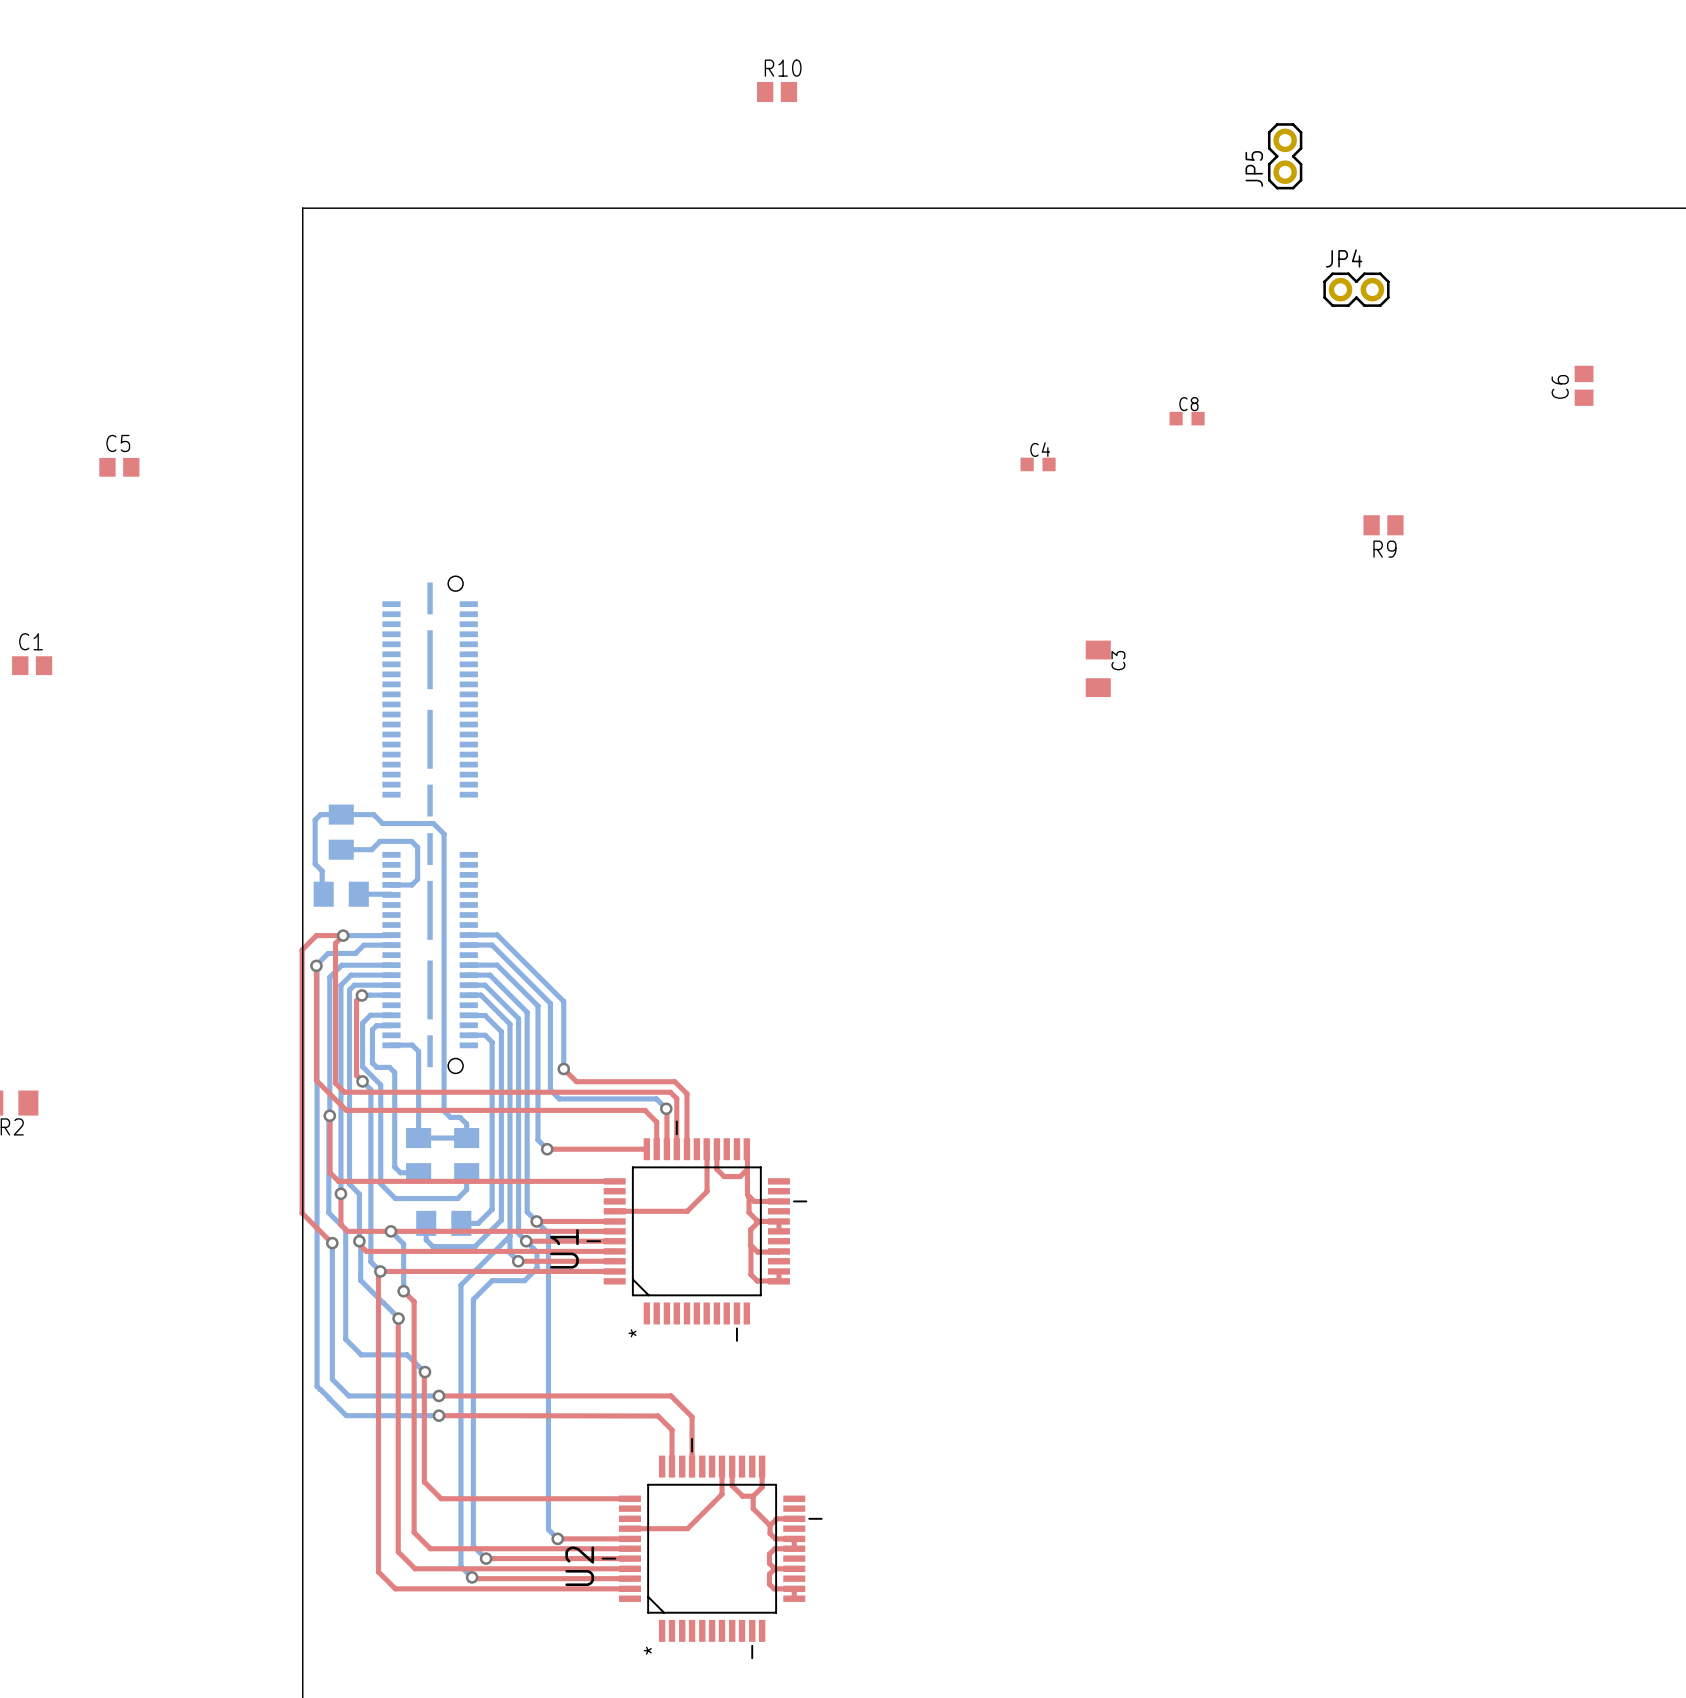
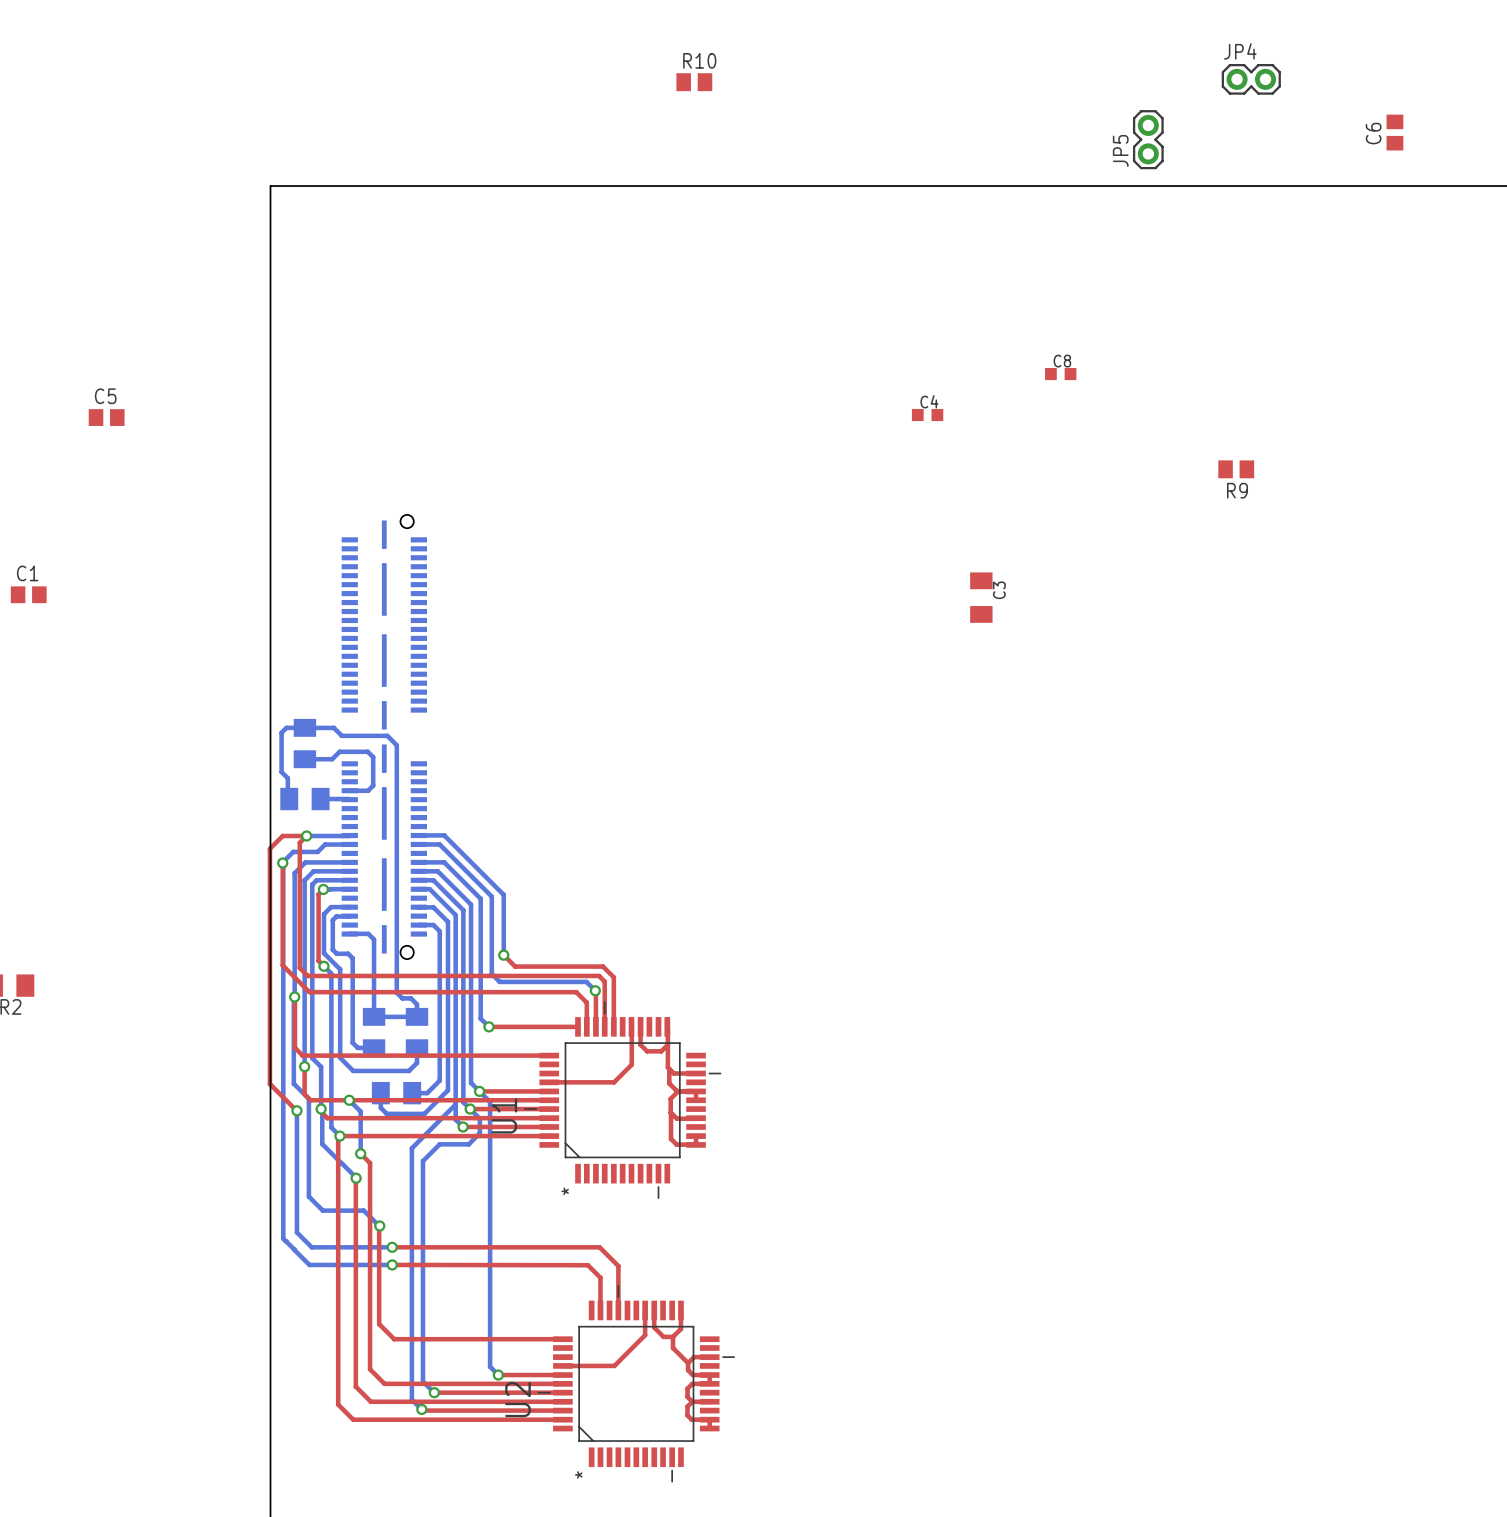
JP4 position: (1356, 289) -> (1251, 79)
C6 position: (1584, 385) -> (1394, 132)

